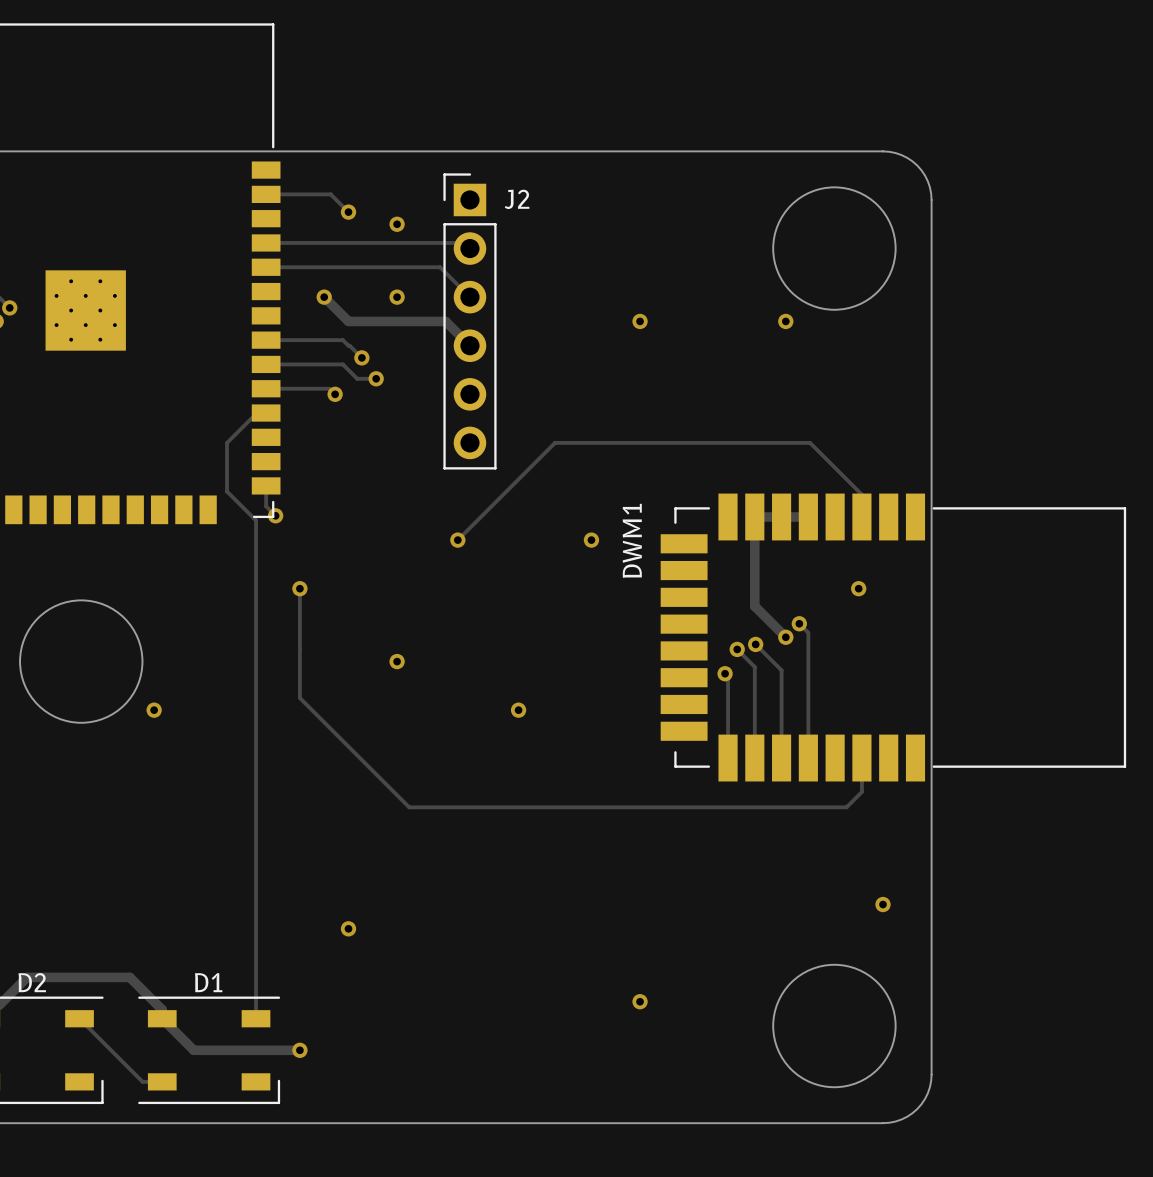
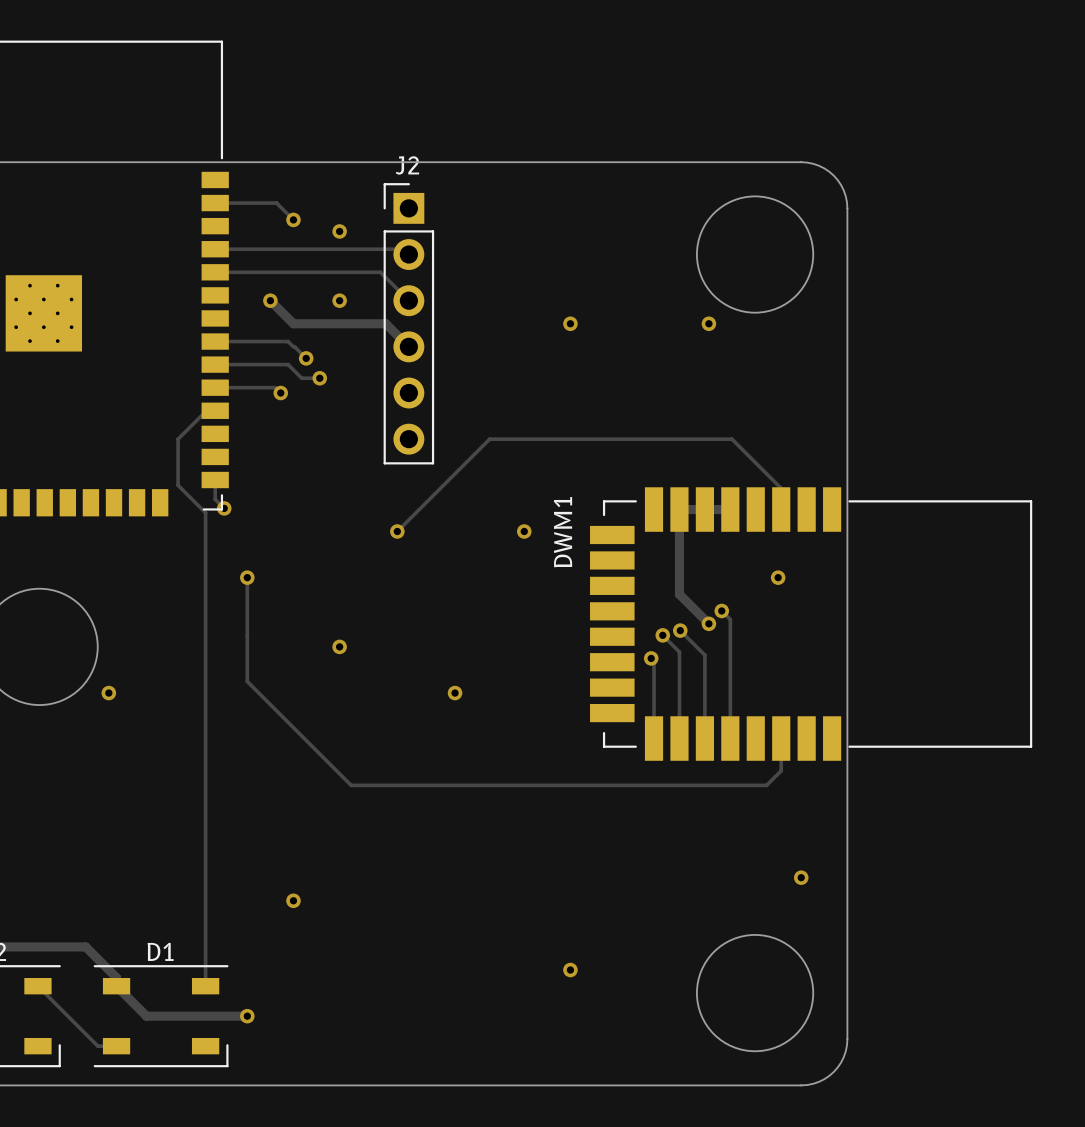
J2 name position: J2 (517, 199) -> J2 (407, 165)

